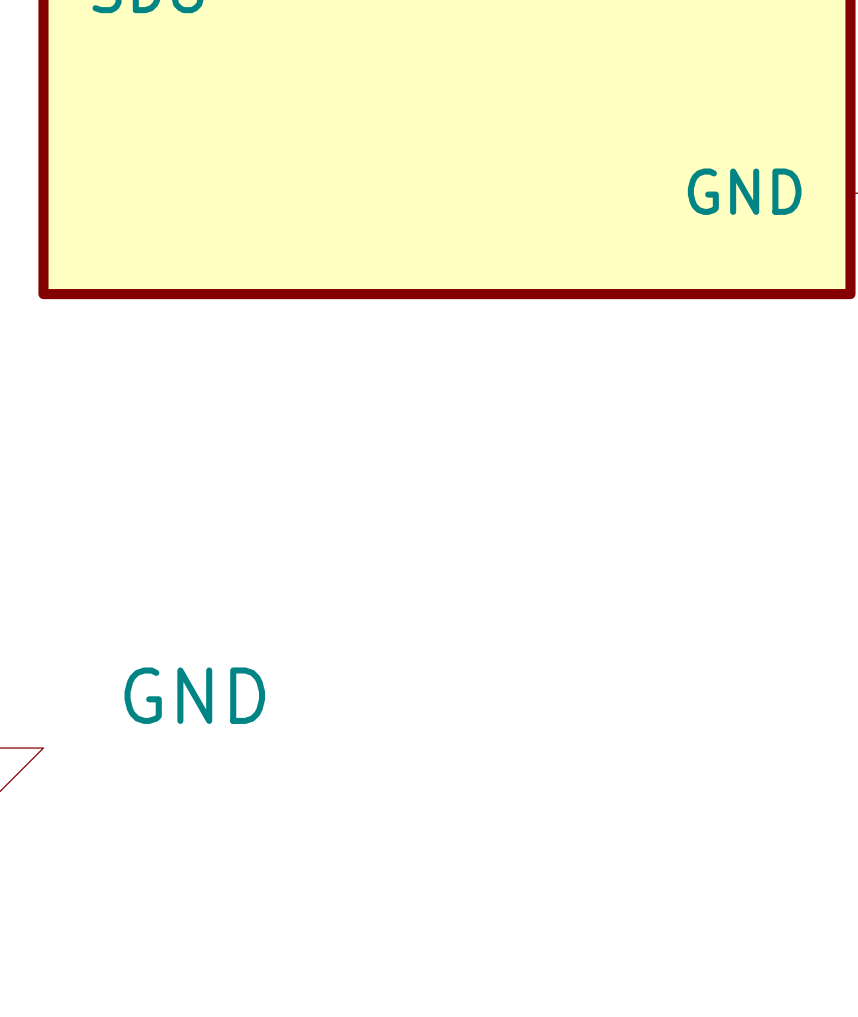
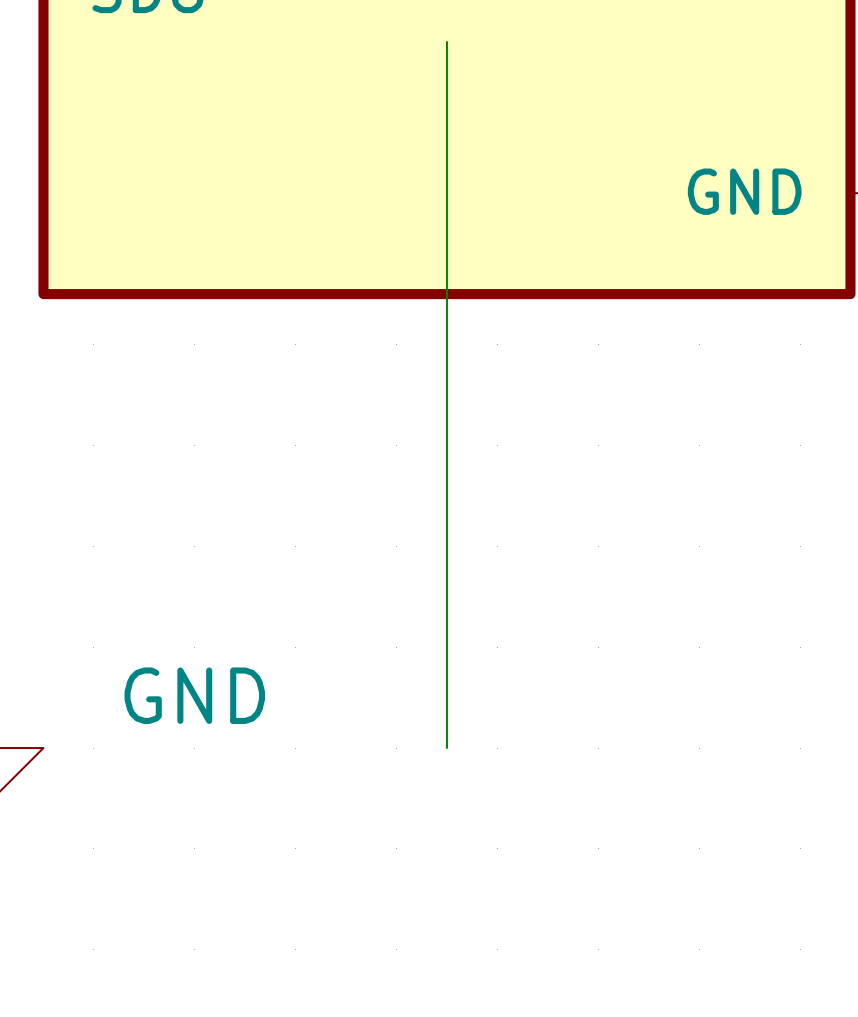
wire: none -> (446, 41) (446, 748)

